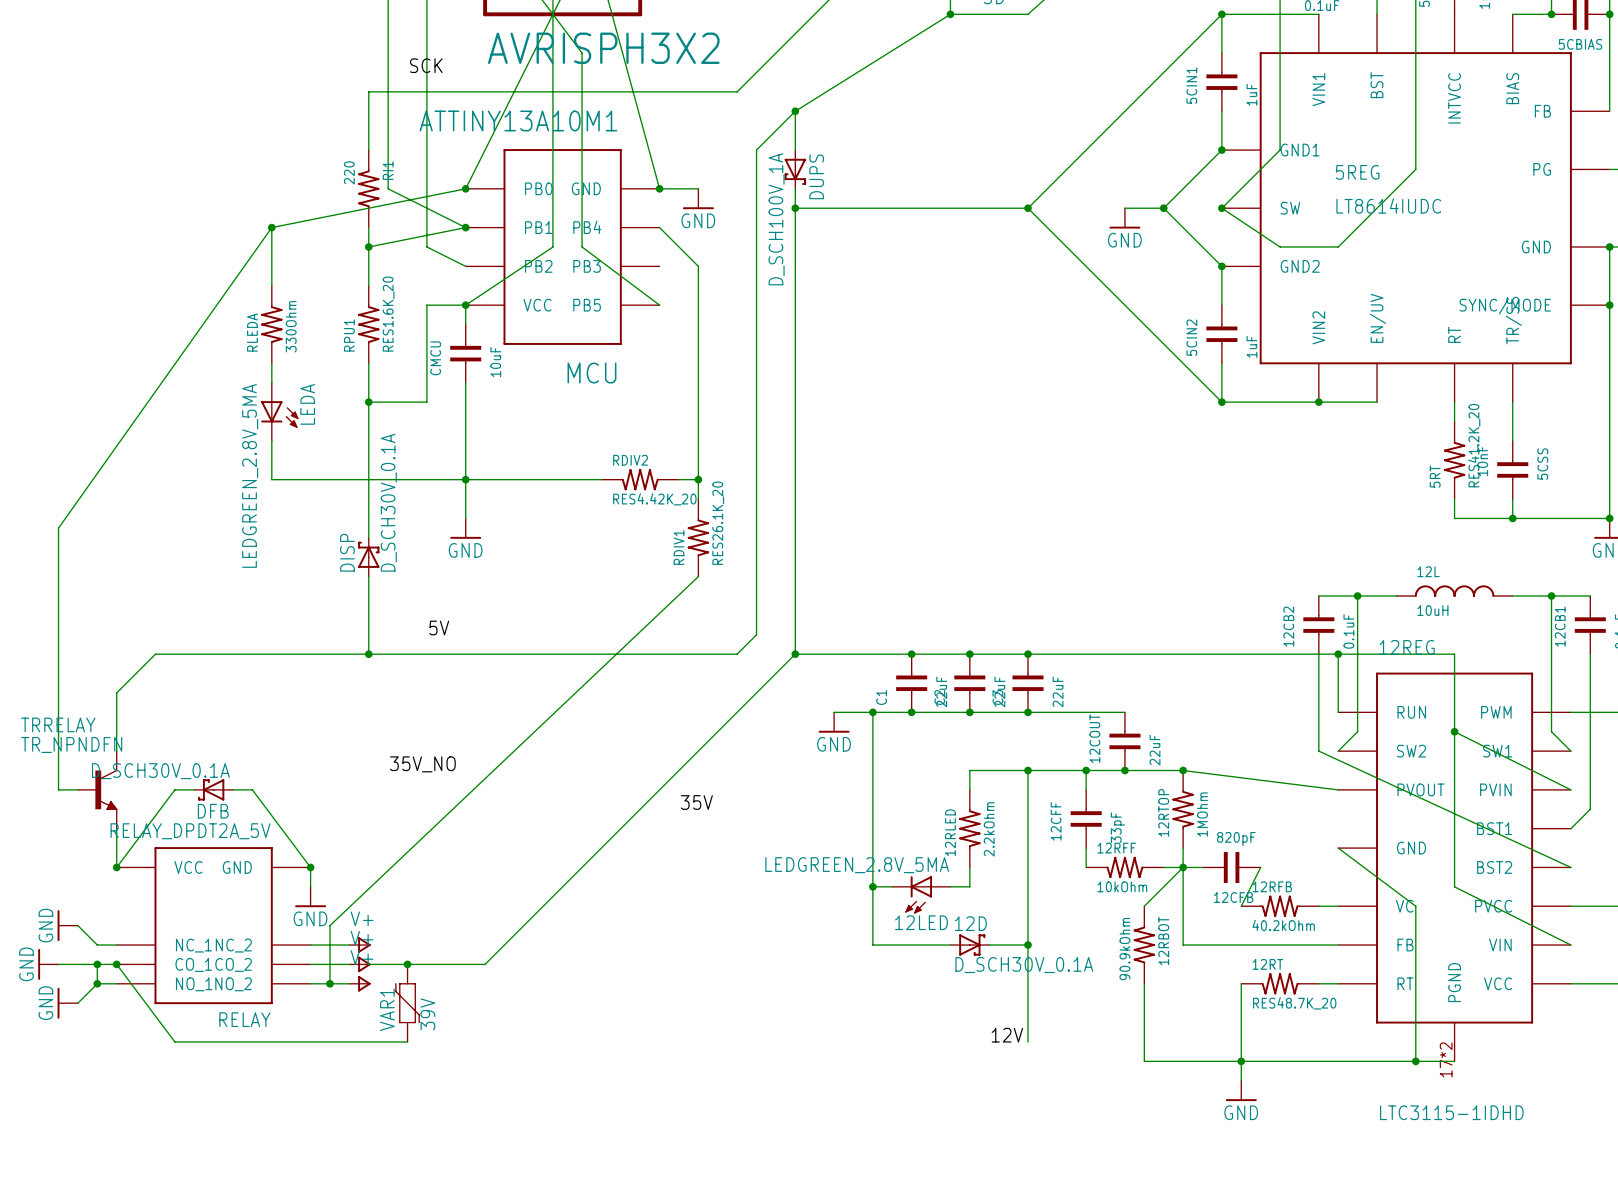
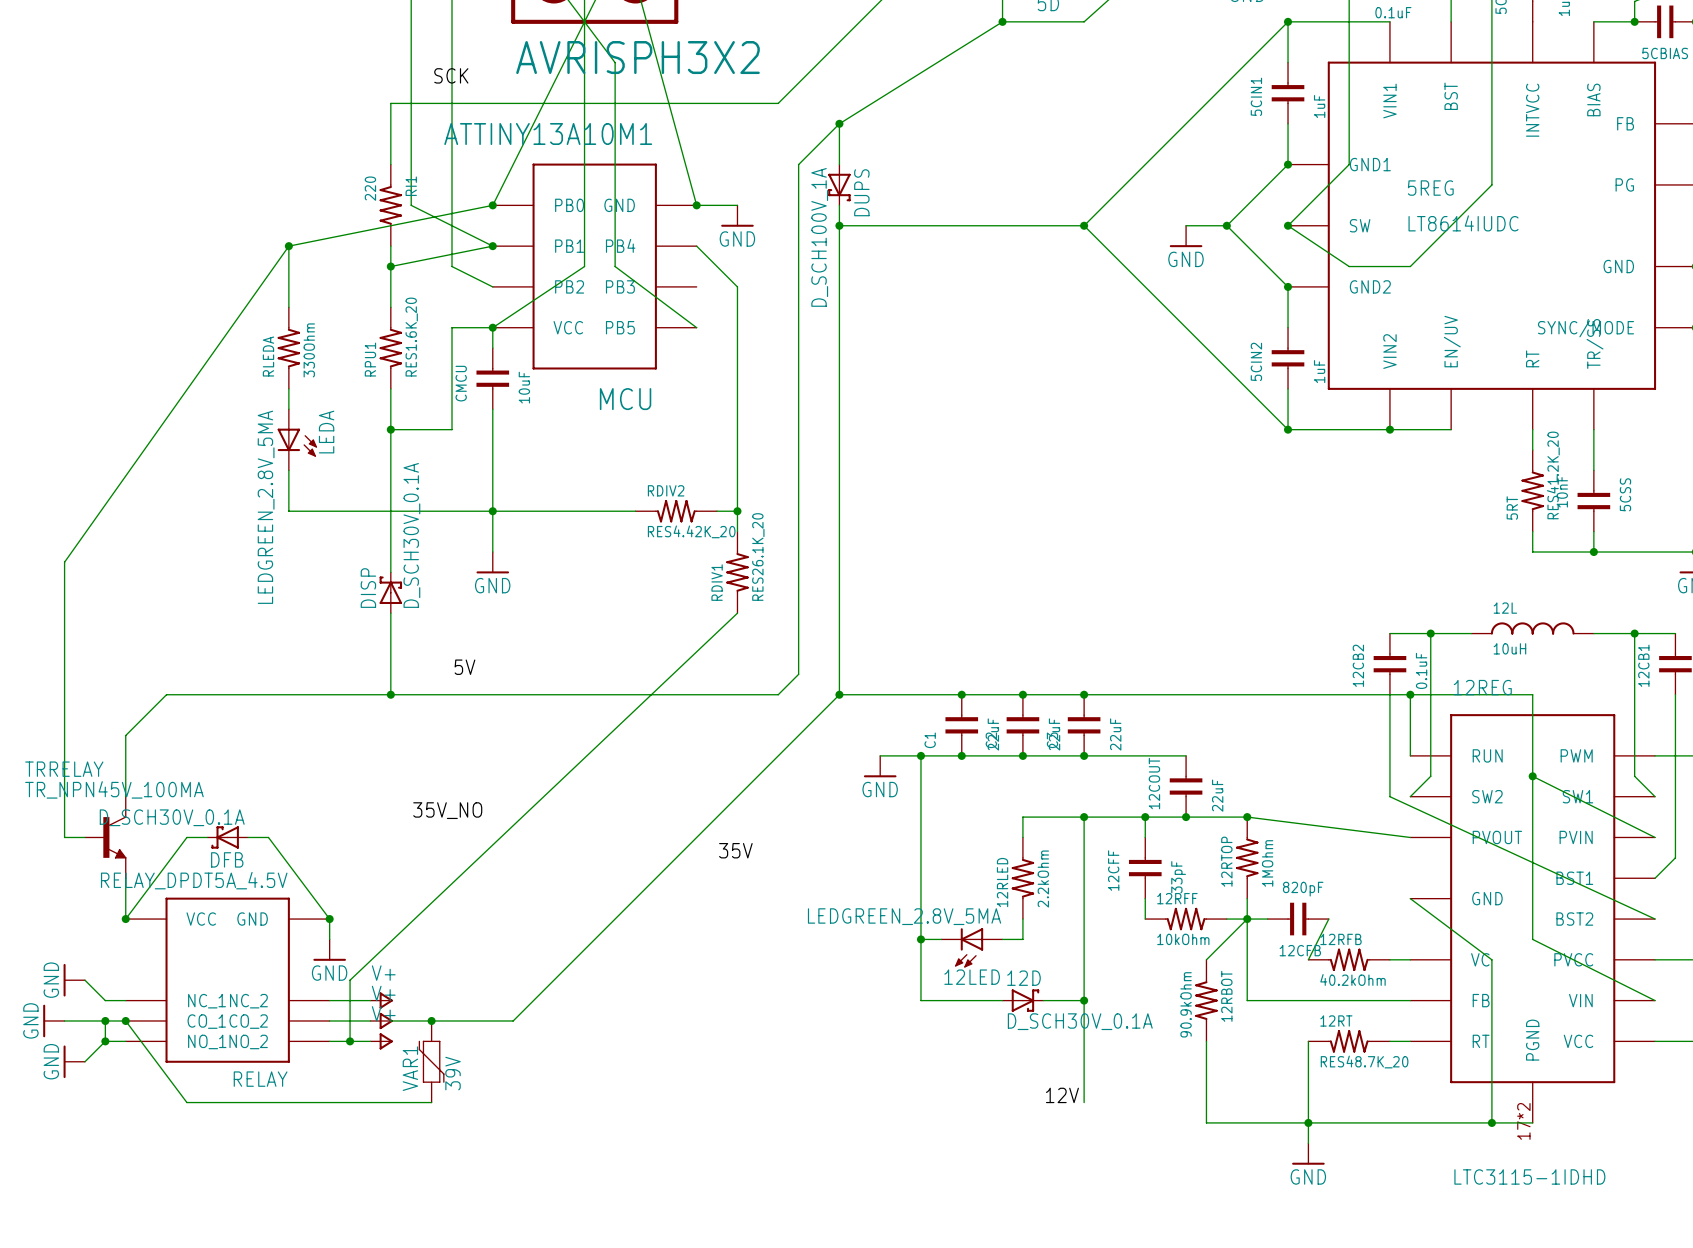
TRRELAY value: TR_NPNDFN (71, 744) -> TR_NPN45V_100MA (114, 789)
RELAY value: RELAY_DPDT2A_5V (190, 831) -> RELAY_DPDT5A_4.5V (194, 880)

